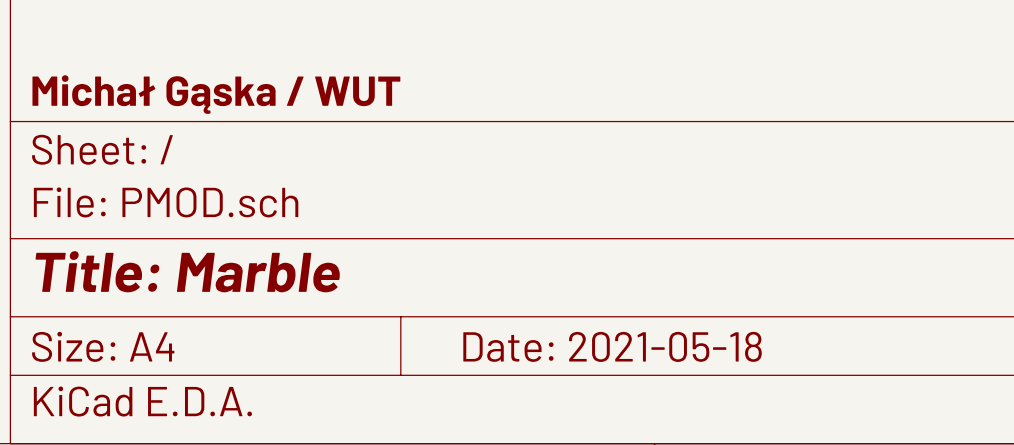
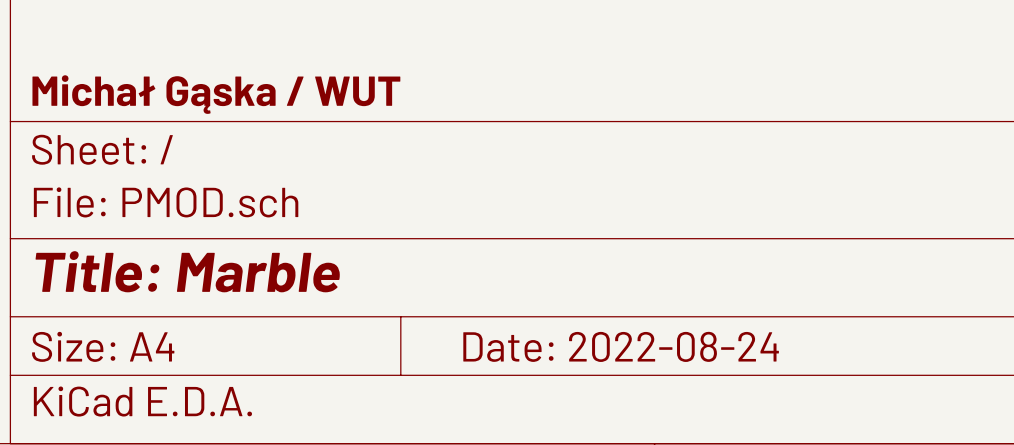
title block: Date: 2021-05-18 (612, 346) -> Date: 2022-08-24 (621, 346)

